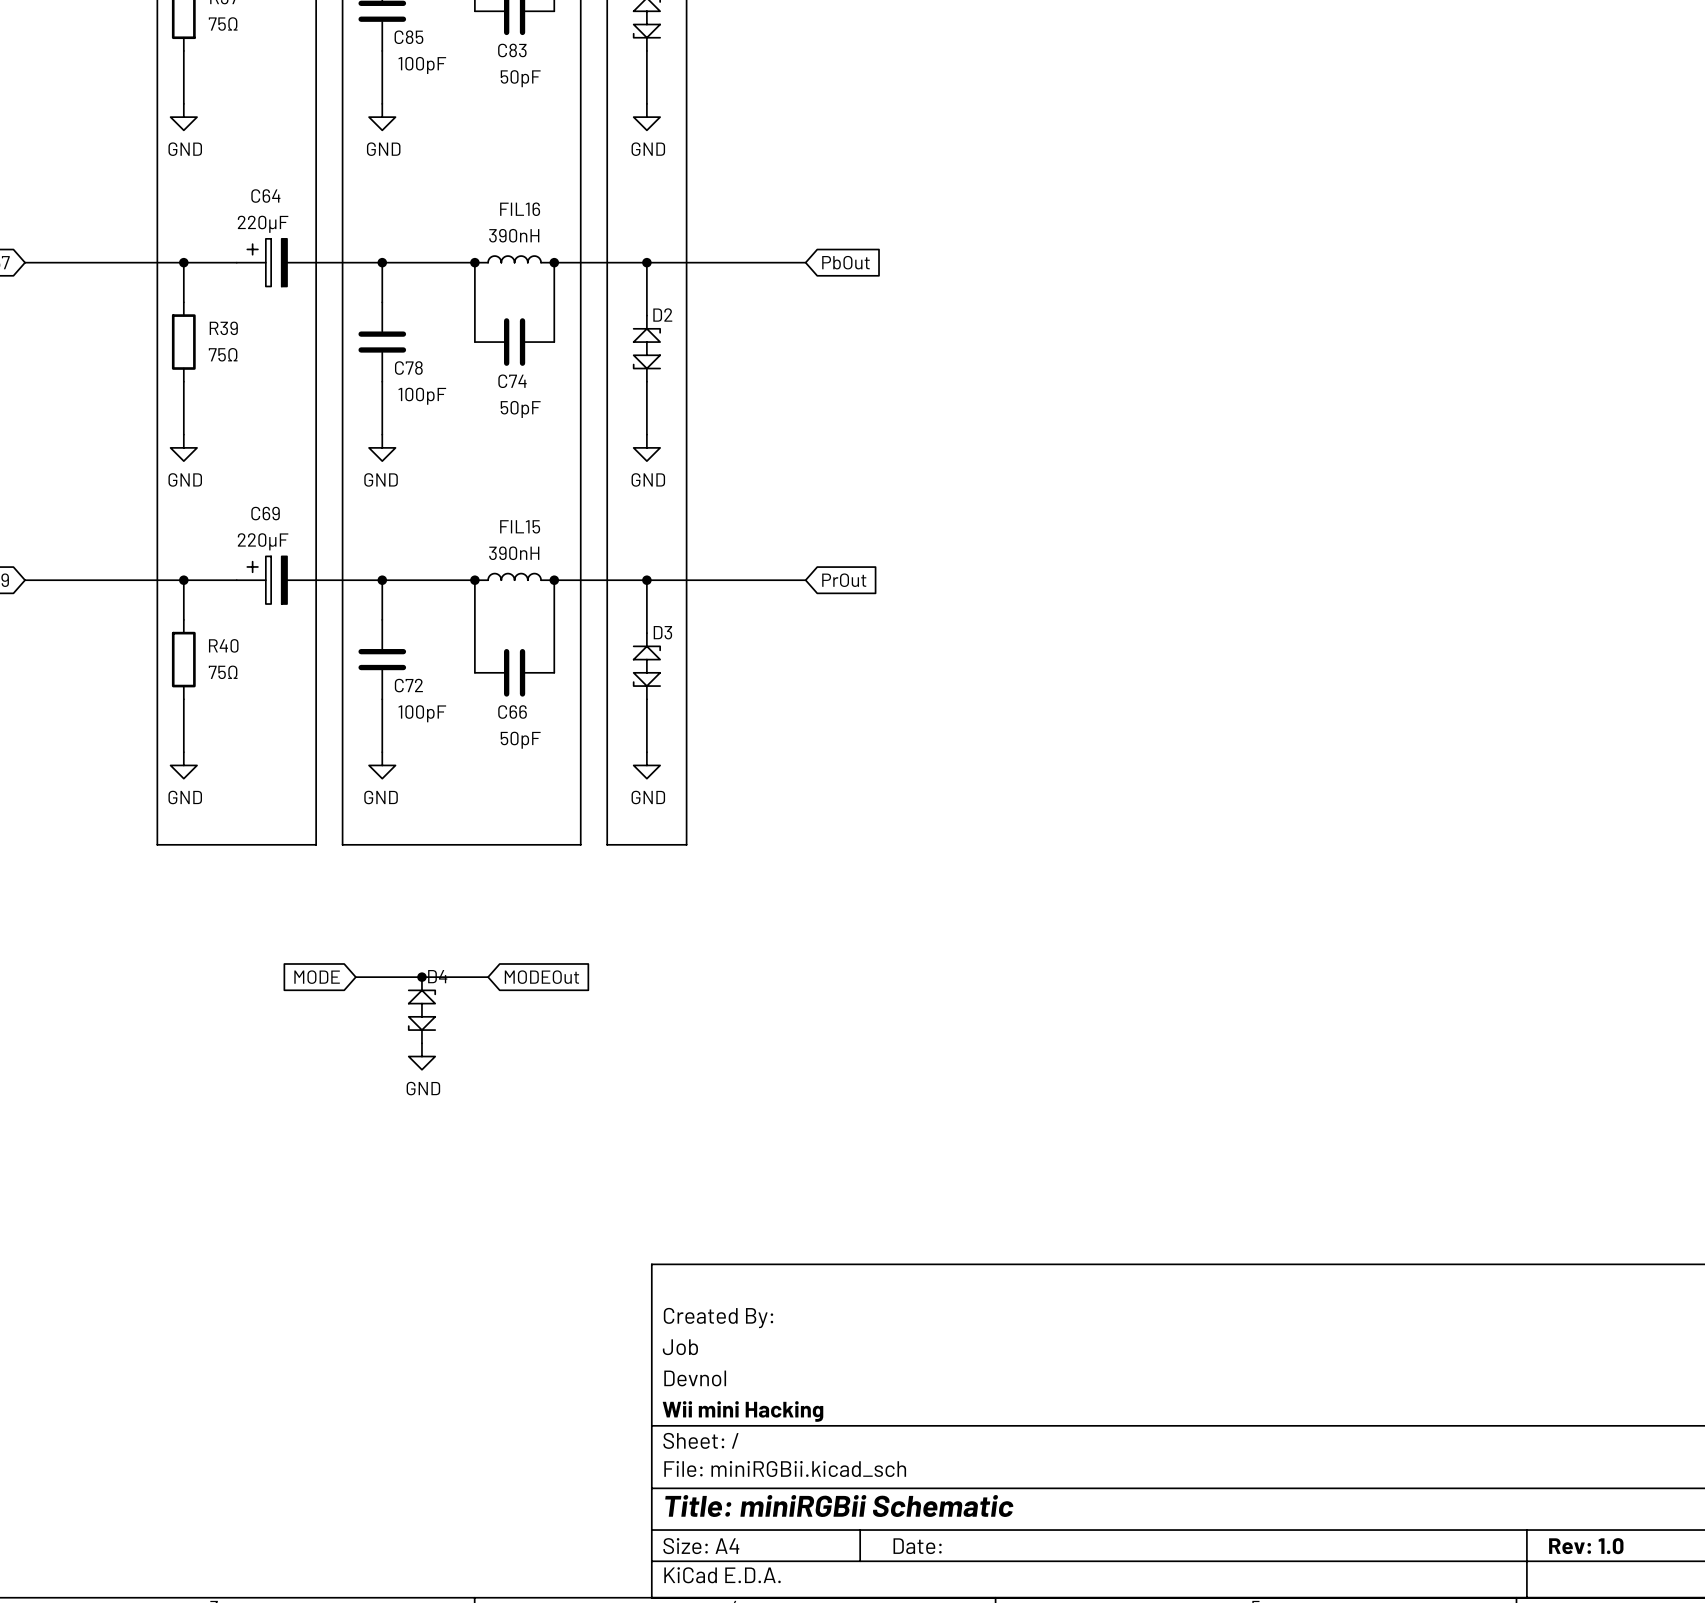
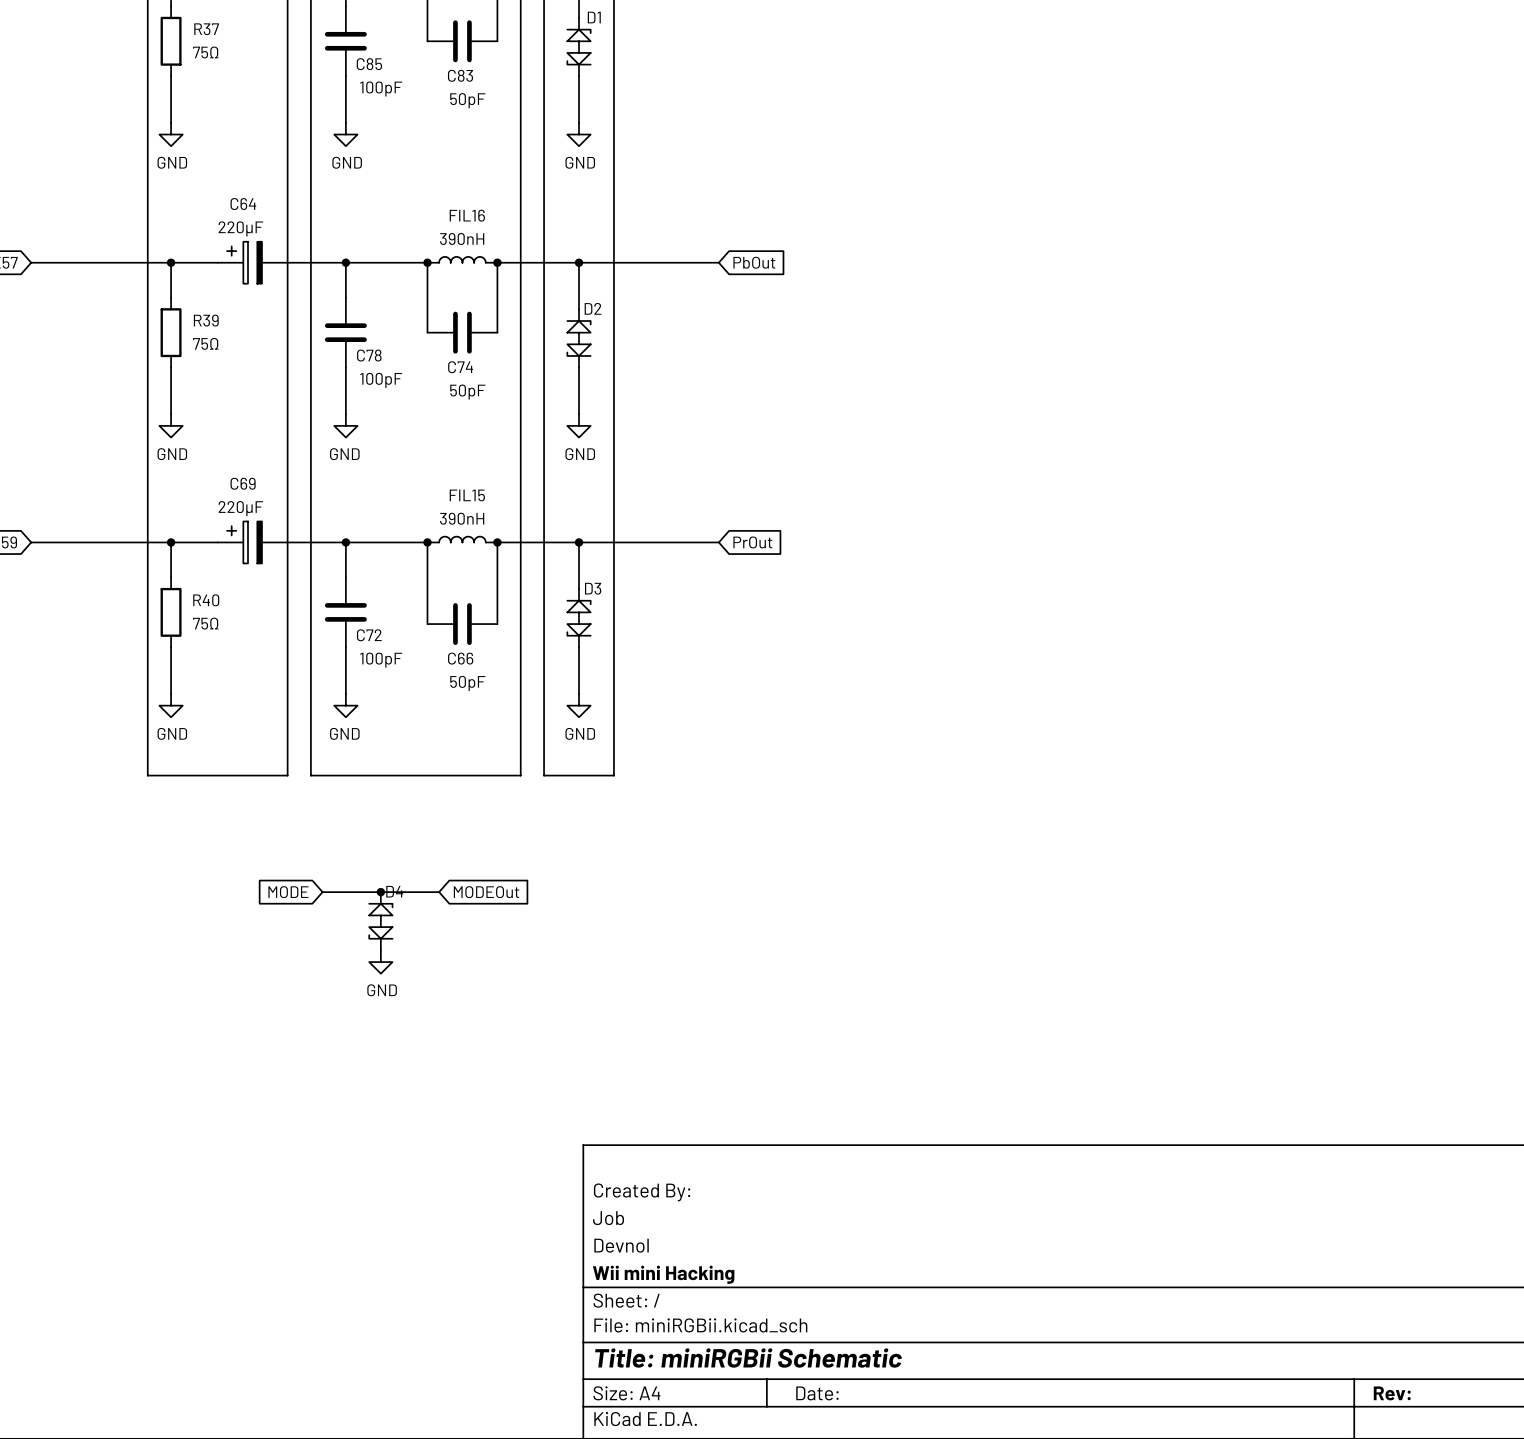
title block: Rev: 1.0 (1586, 1546) -> Rev: (1392, 1393)

